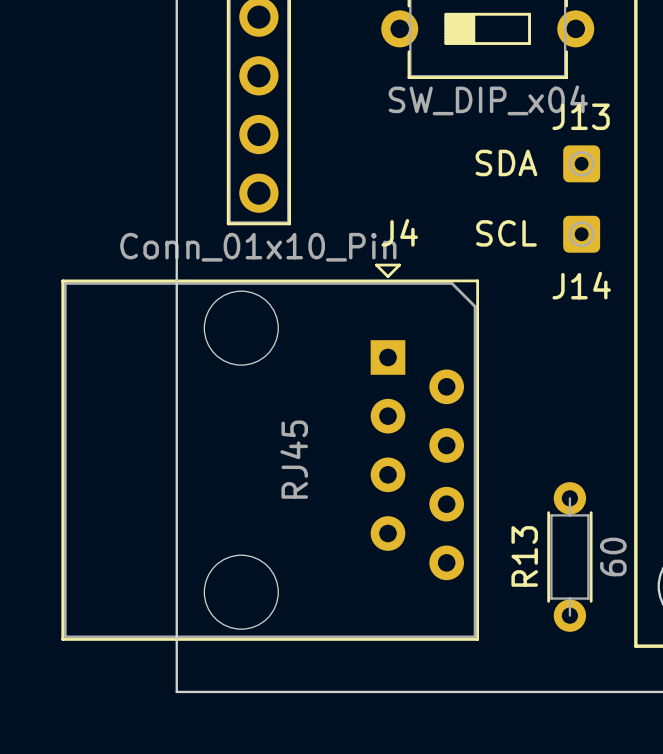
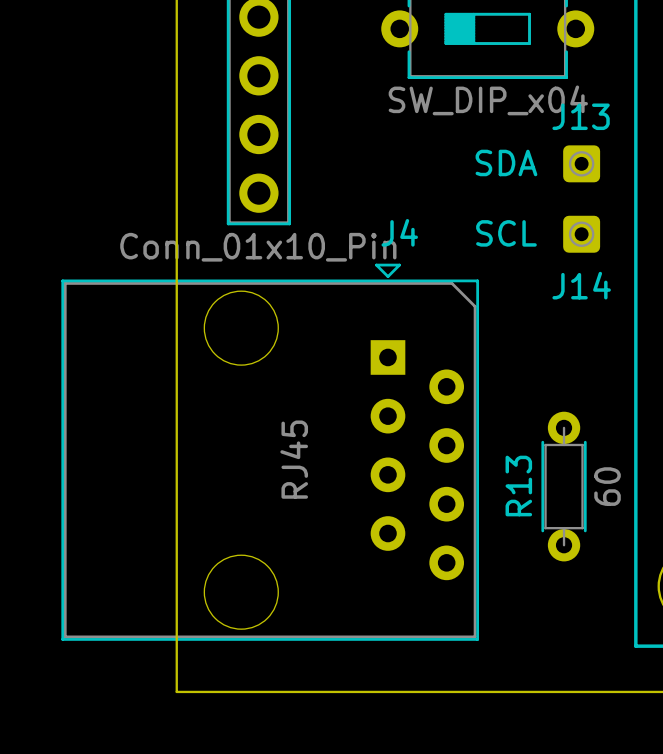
R13 position: (569, 556) -> (564, 486)

